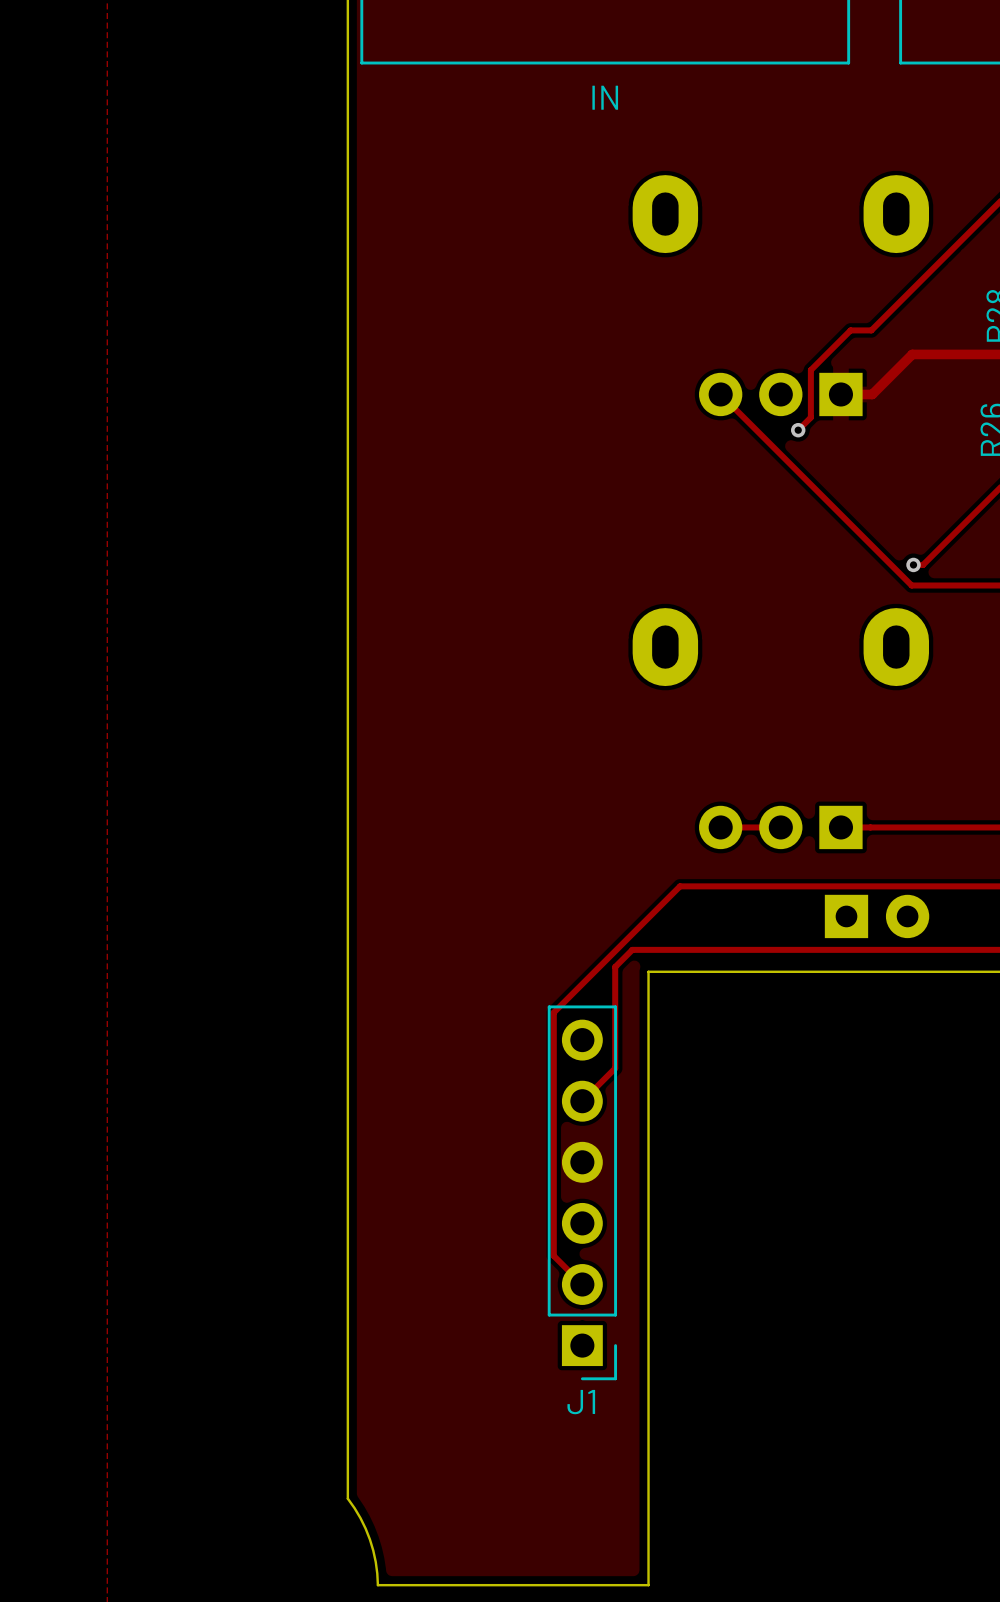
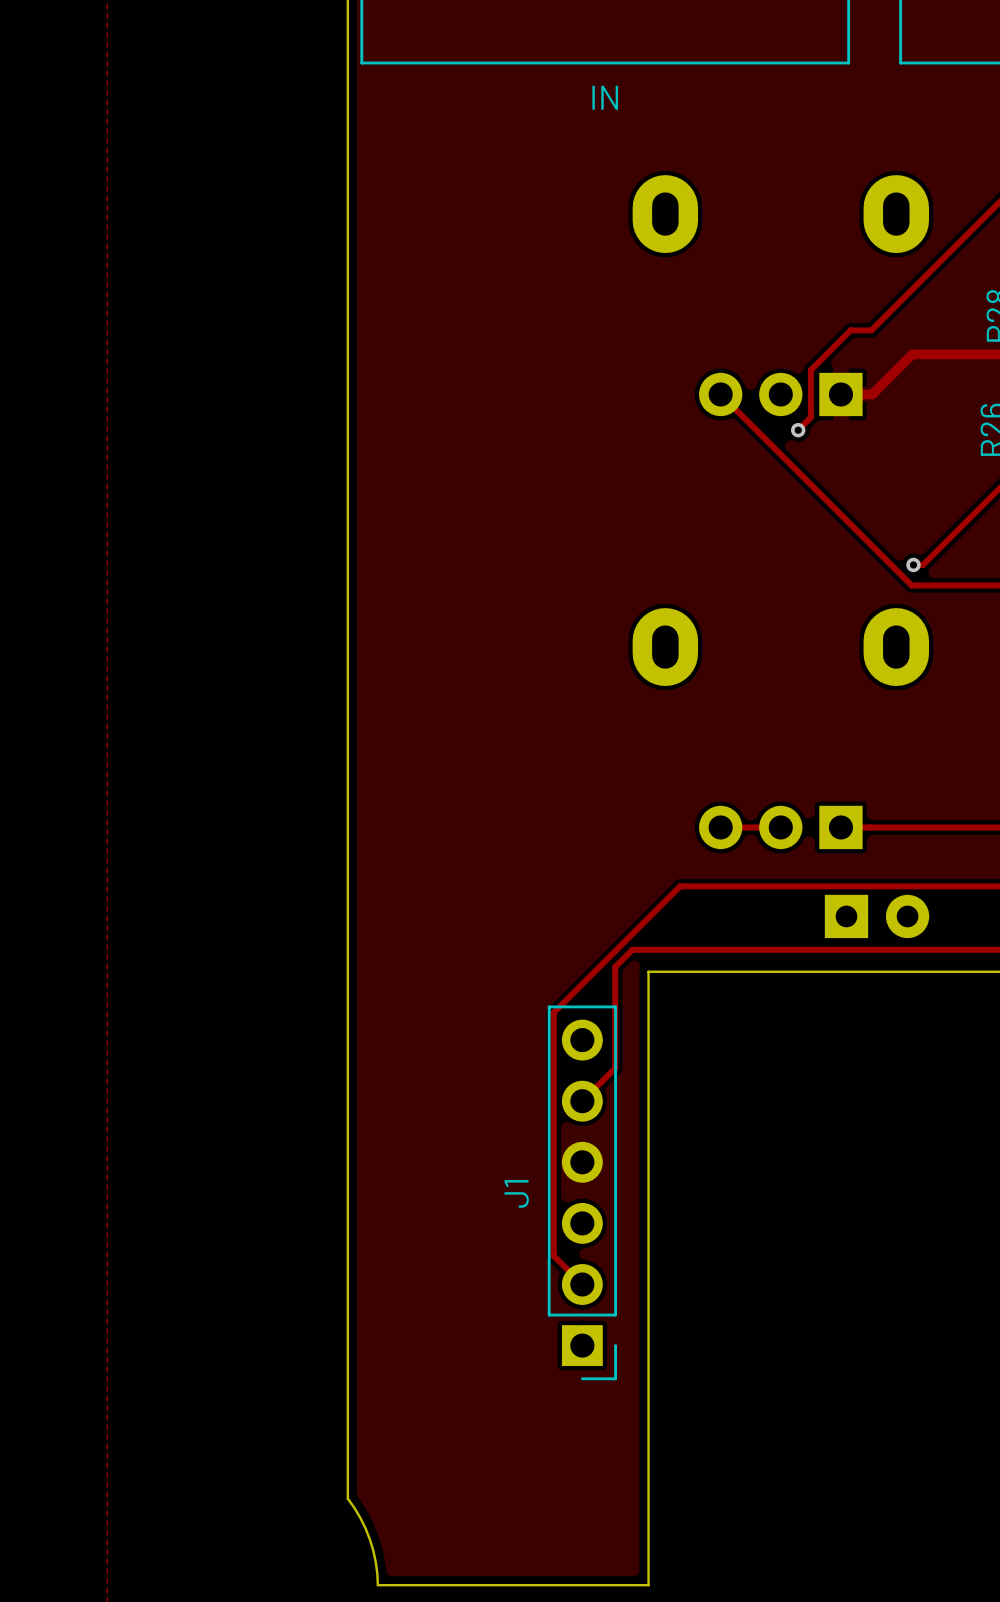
J1 name rotation: 0° (581, 1402) -> 90° counterclockwise (516, 1193)
J1 name position: J1 (581, 1402) -> J1 (516, 1193)

